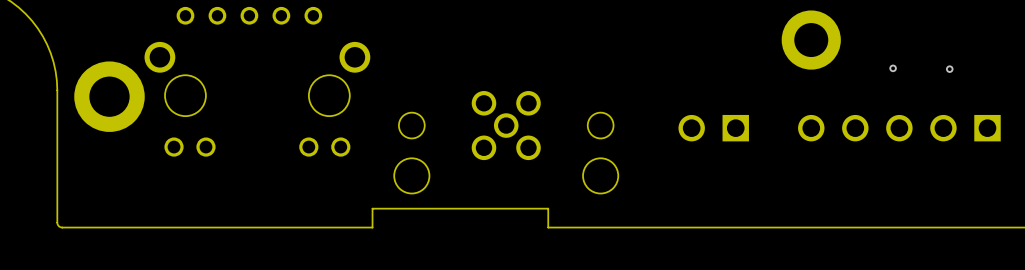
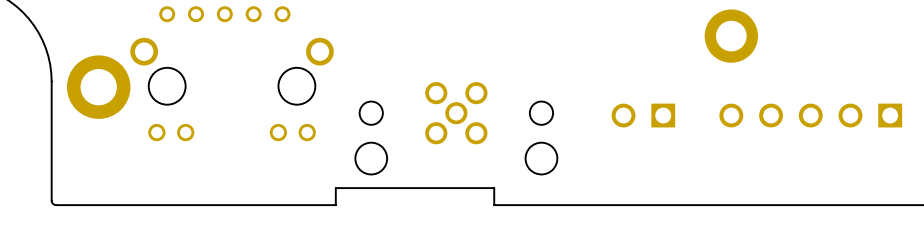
via: (893, 68) -> none
via: (949, 69) -> none

